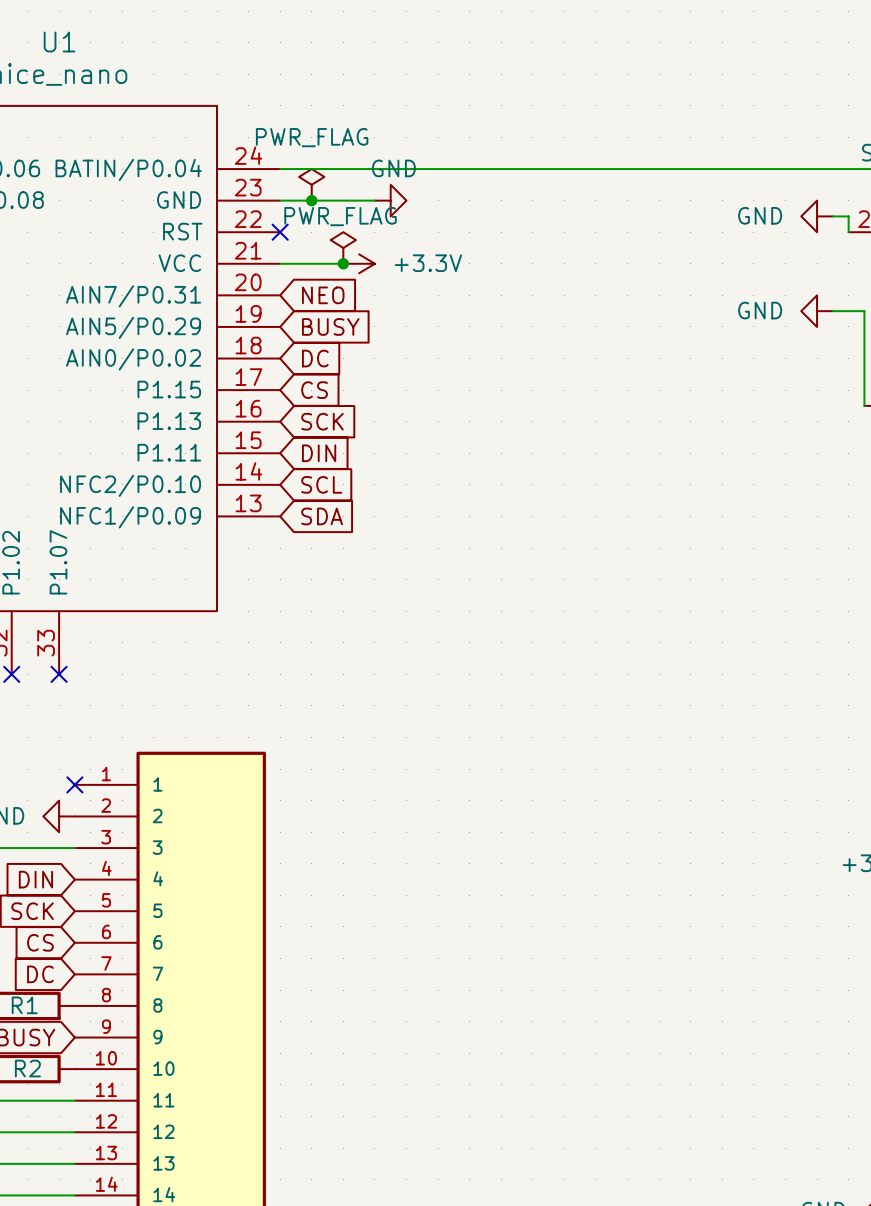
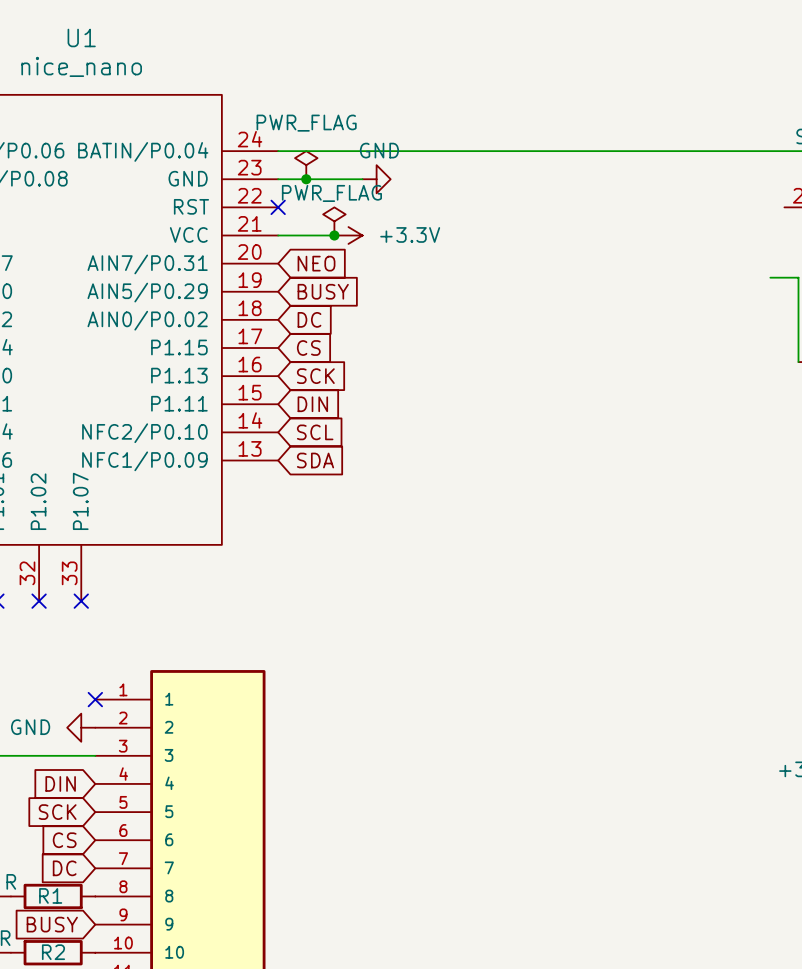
power symbol: GND (817, 216) -> none
wire: (832, 216) (848, 216) (848, 232) -> none
power symbol: GND (817, 311) -> none

